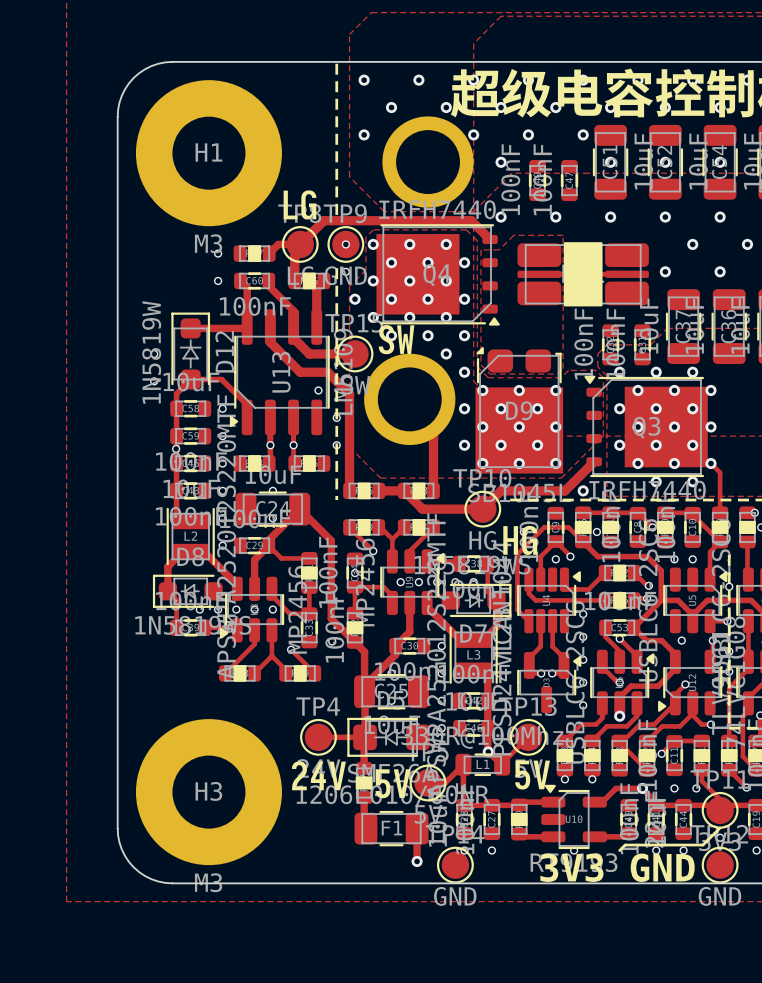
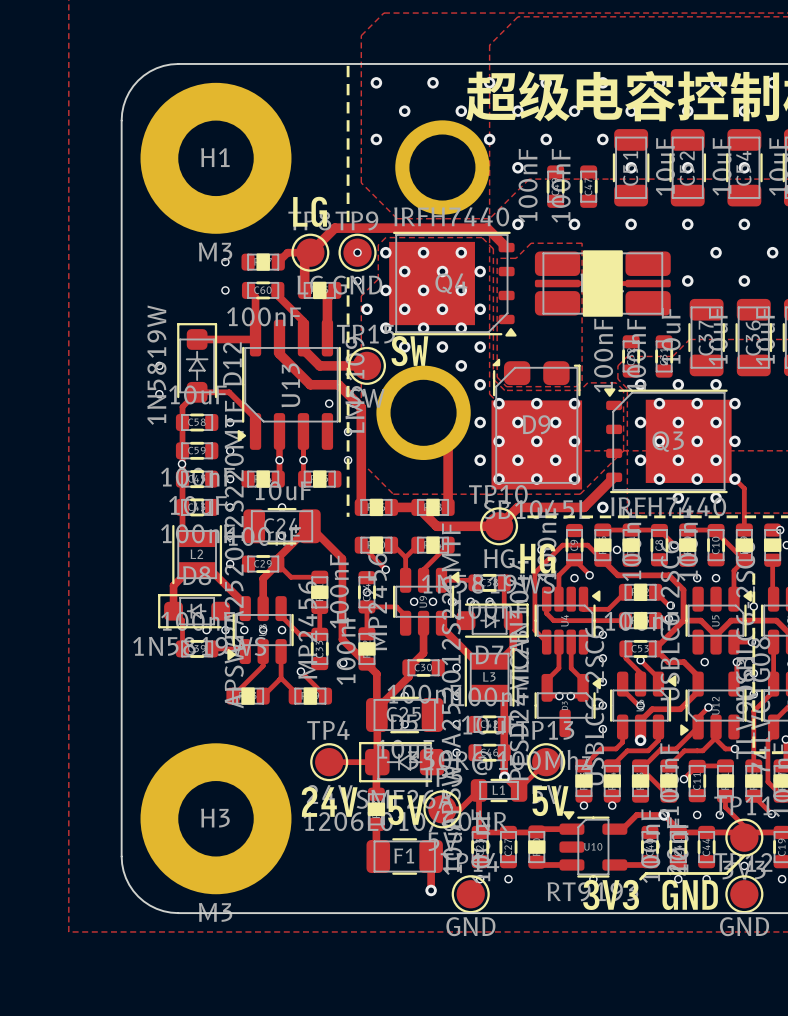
drawing: none -> [583, 879, 640, 910]
drawing: none -> [662, 879, 718, 910]
text: 3V3 GND (617, 867) -> none

